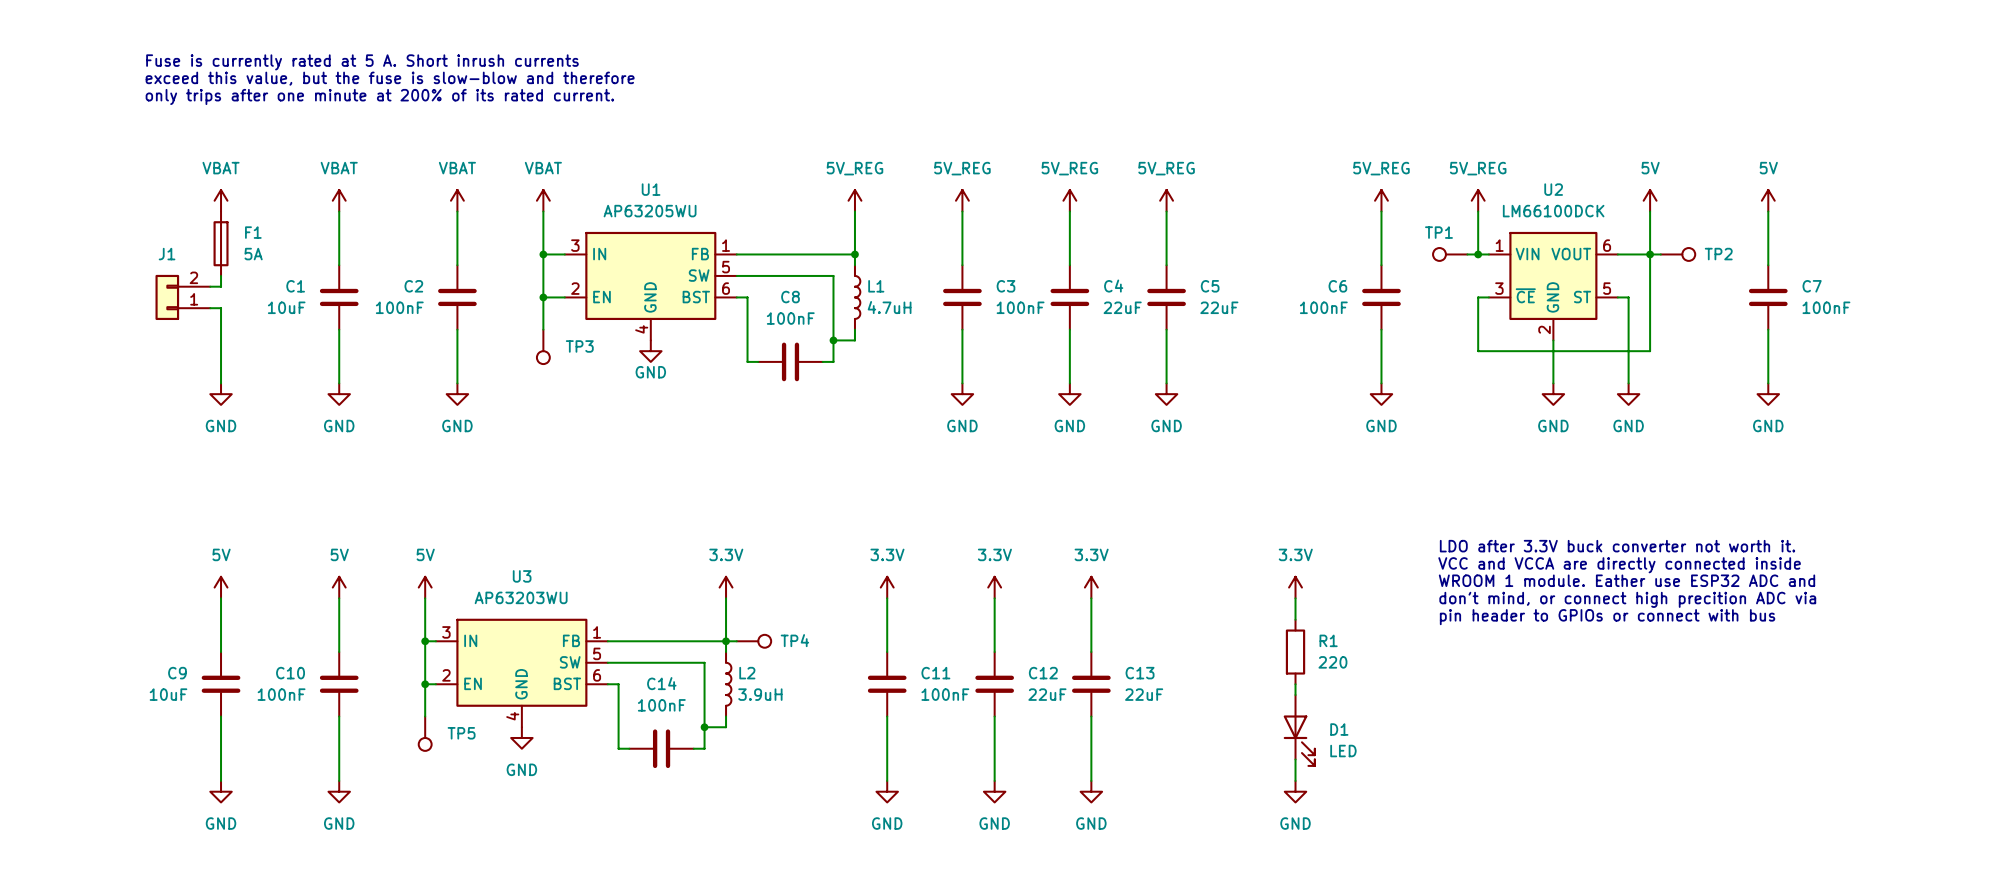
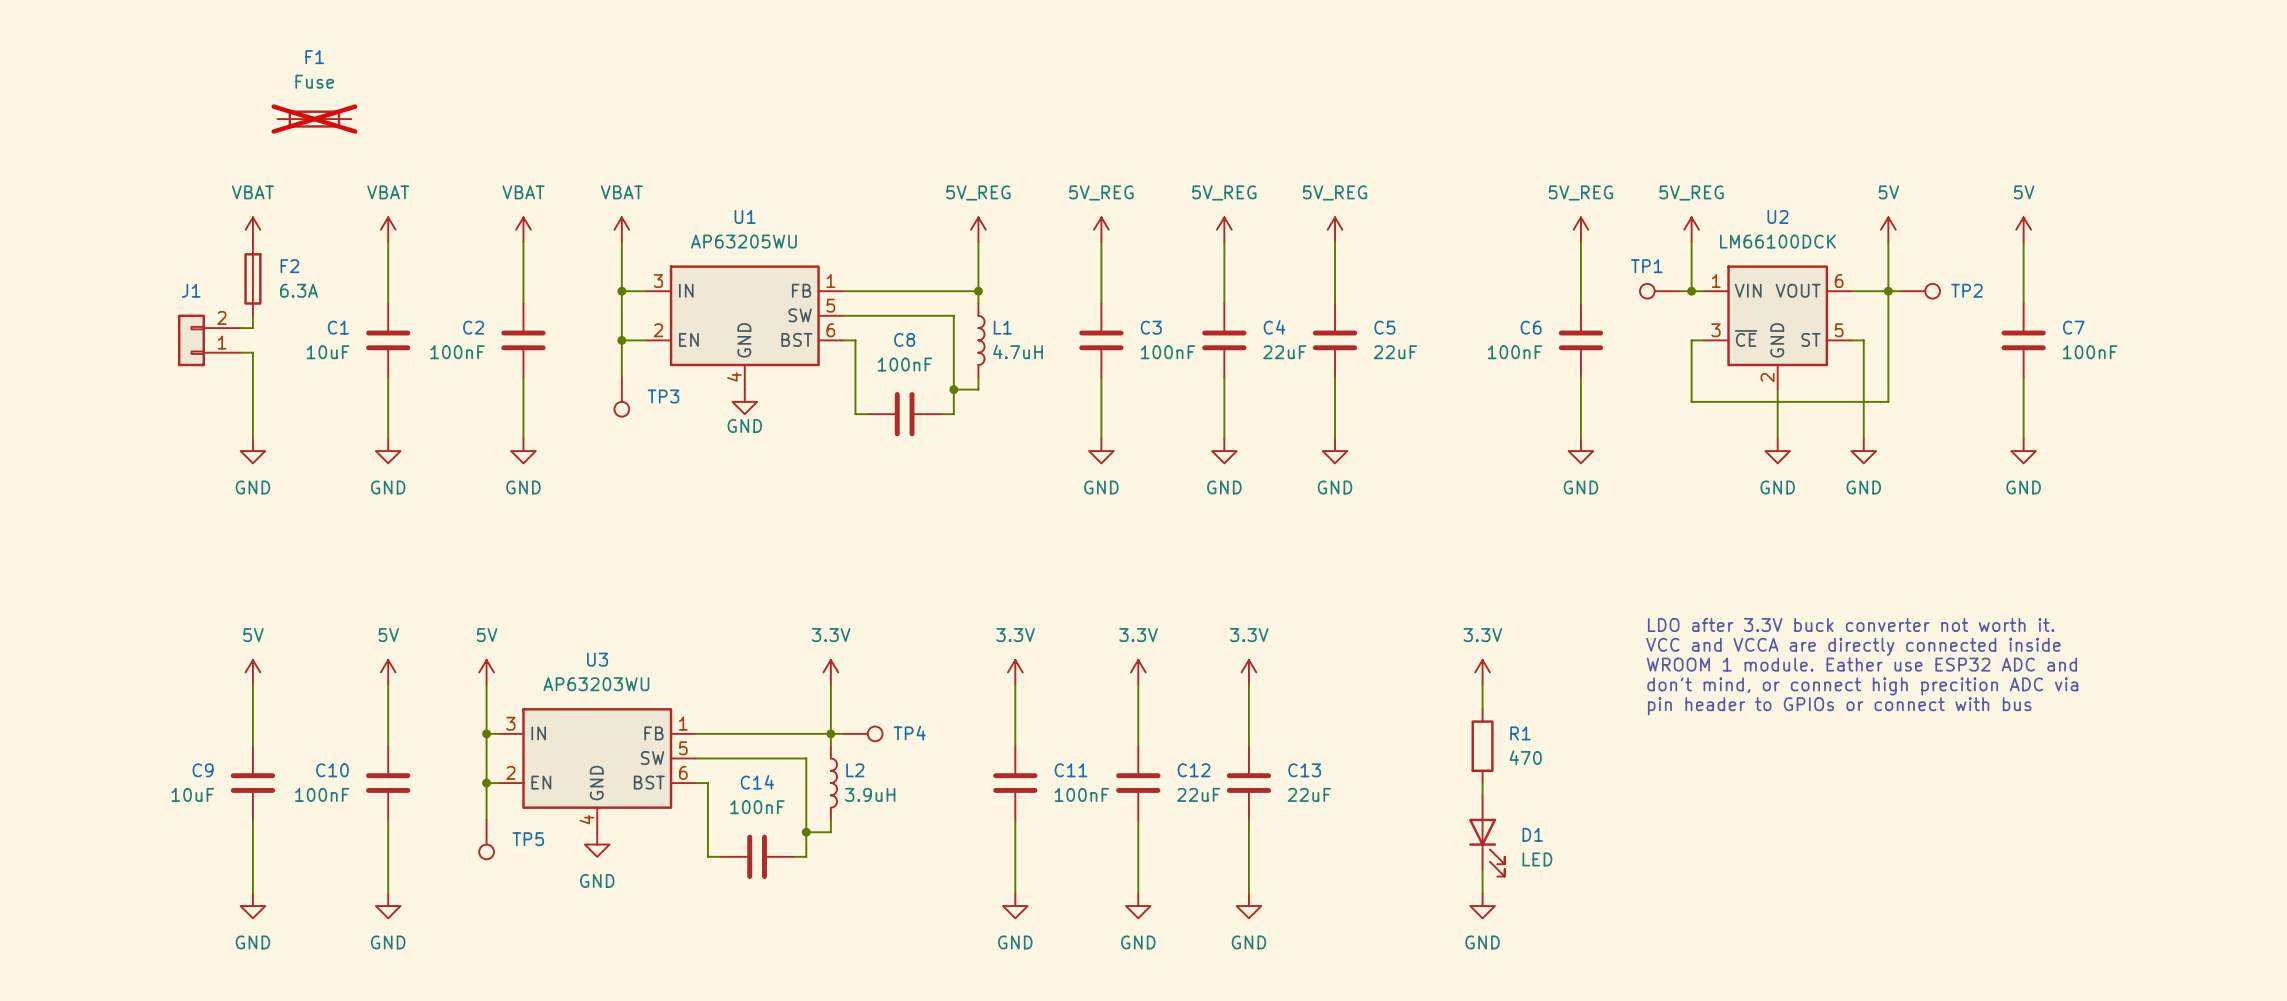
text: Fuse is currently rated at 5 A. Short inrush currents (362, 62) -> none
text: exceed this value, but the fuse is slow-blow and therefore (390, 78) -> none
text: only trips after one minute at 200% of its rated current. (379, 96) -> none
F1: none -> Fuse (314, 119)
F1 name: F1 (253, 232) -> F2 (289, 266)
F1 value: 5A (253, 254) -> 6.3A (299, 290)
R1 value: 220 (1332, 662) -> 470 (1525, 757)

